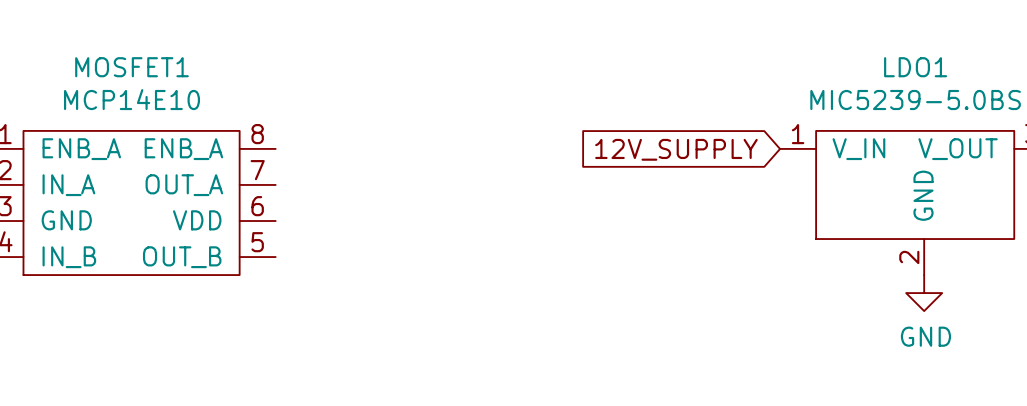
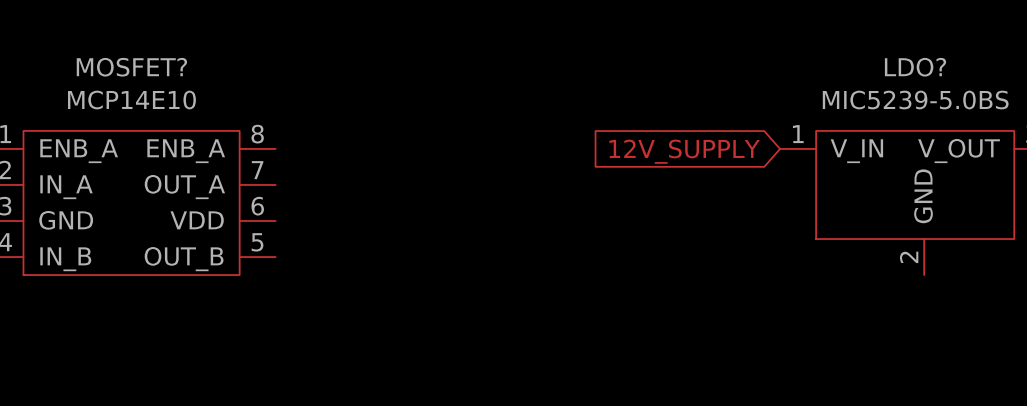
MOSFET1 name: MOSFET1 (131, 67) -> MOSFET? (131, 67)
LDO1 name: LDO1 (915, 67) -> LDO? (915, 67)
power symbol: GND (924, 293) -> none

